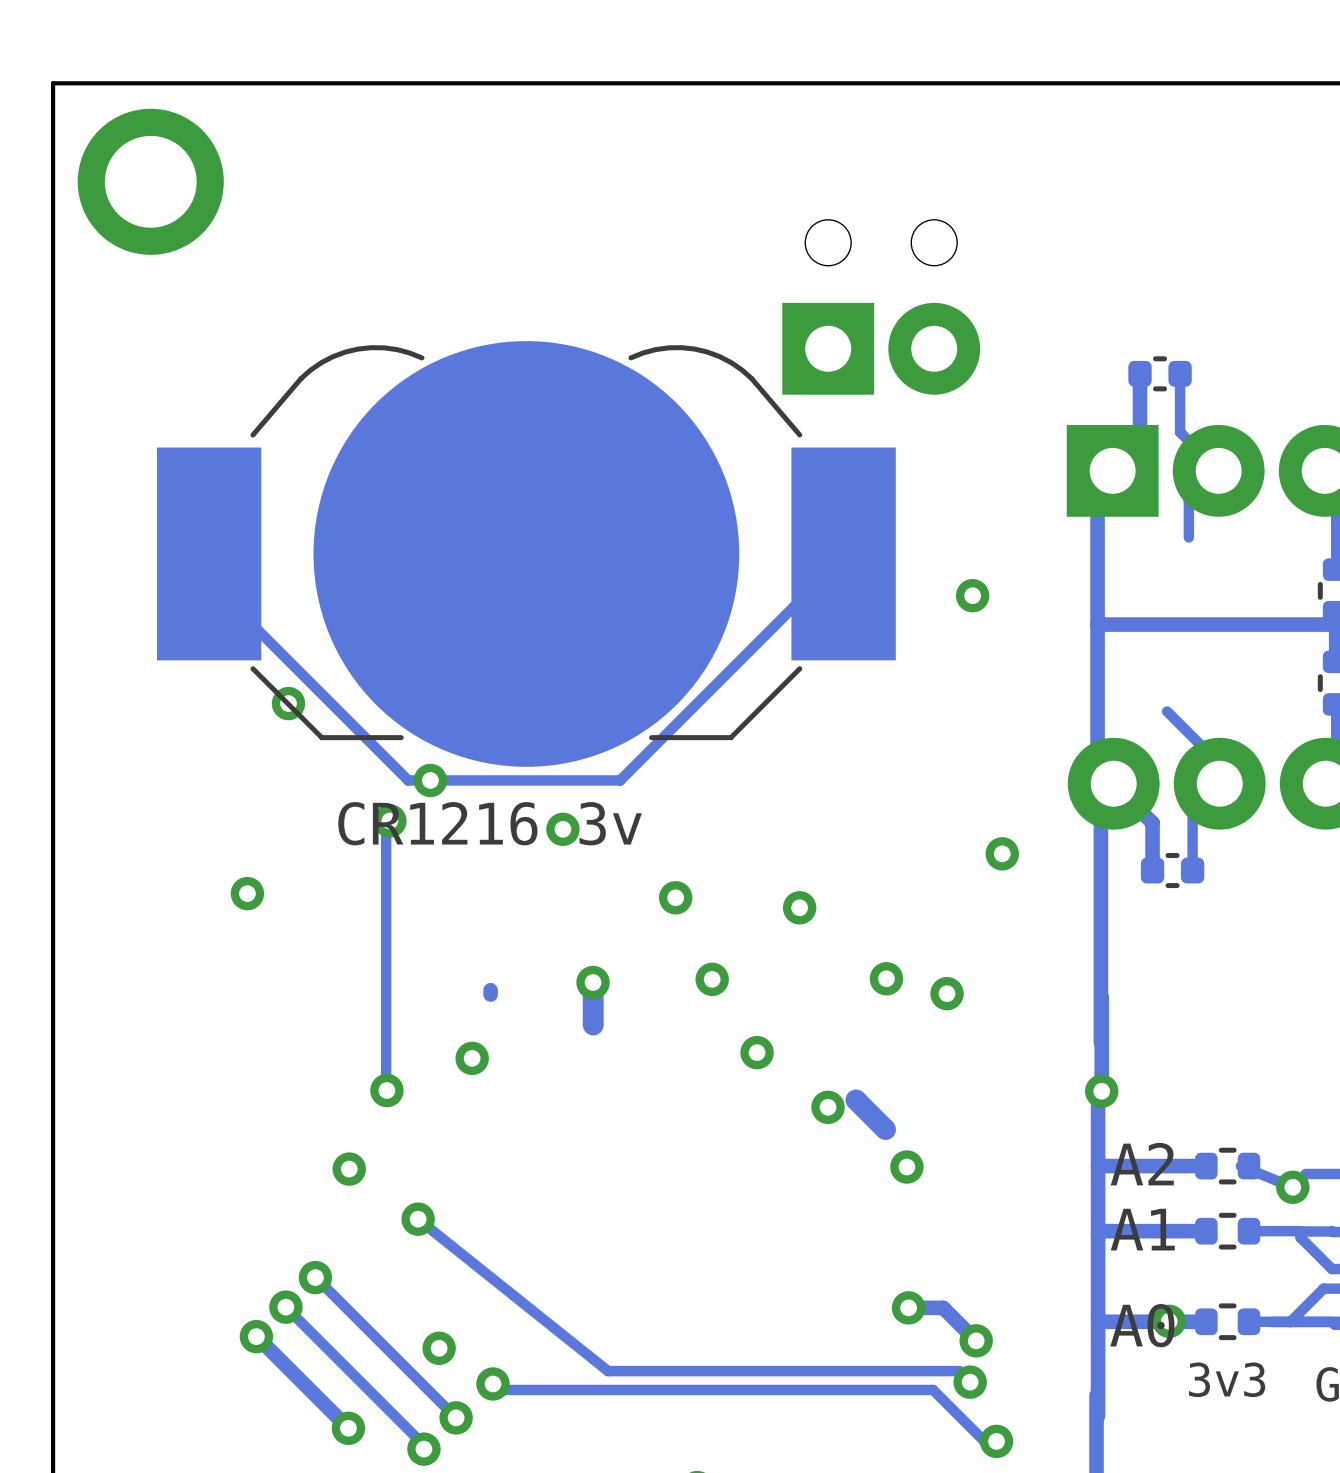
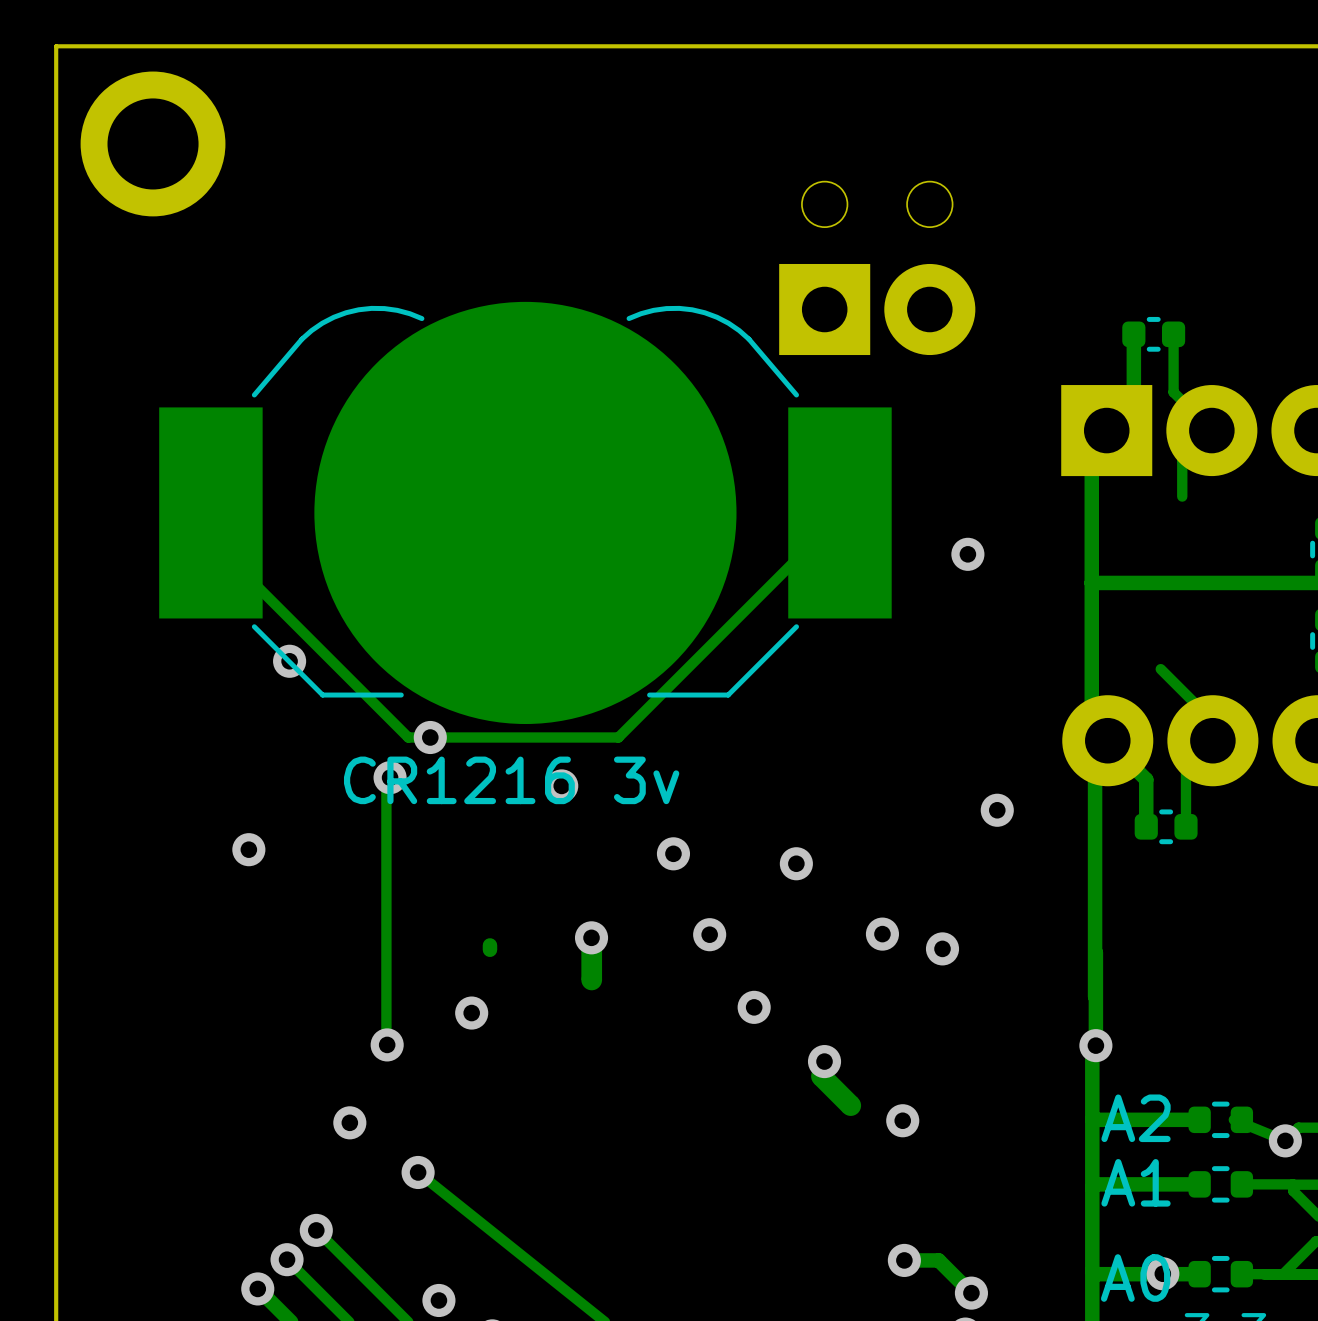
part position: (870, 1114) -> (836, 1090)

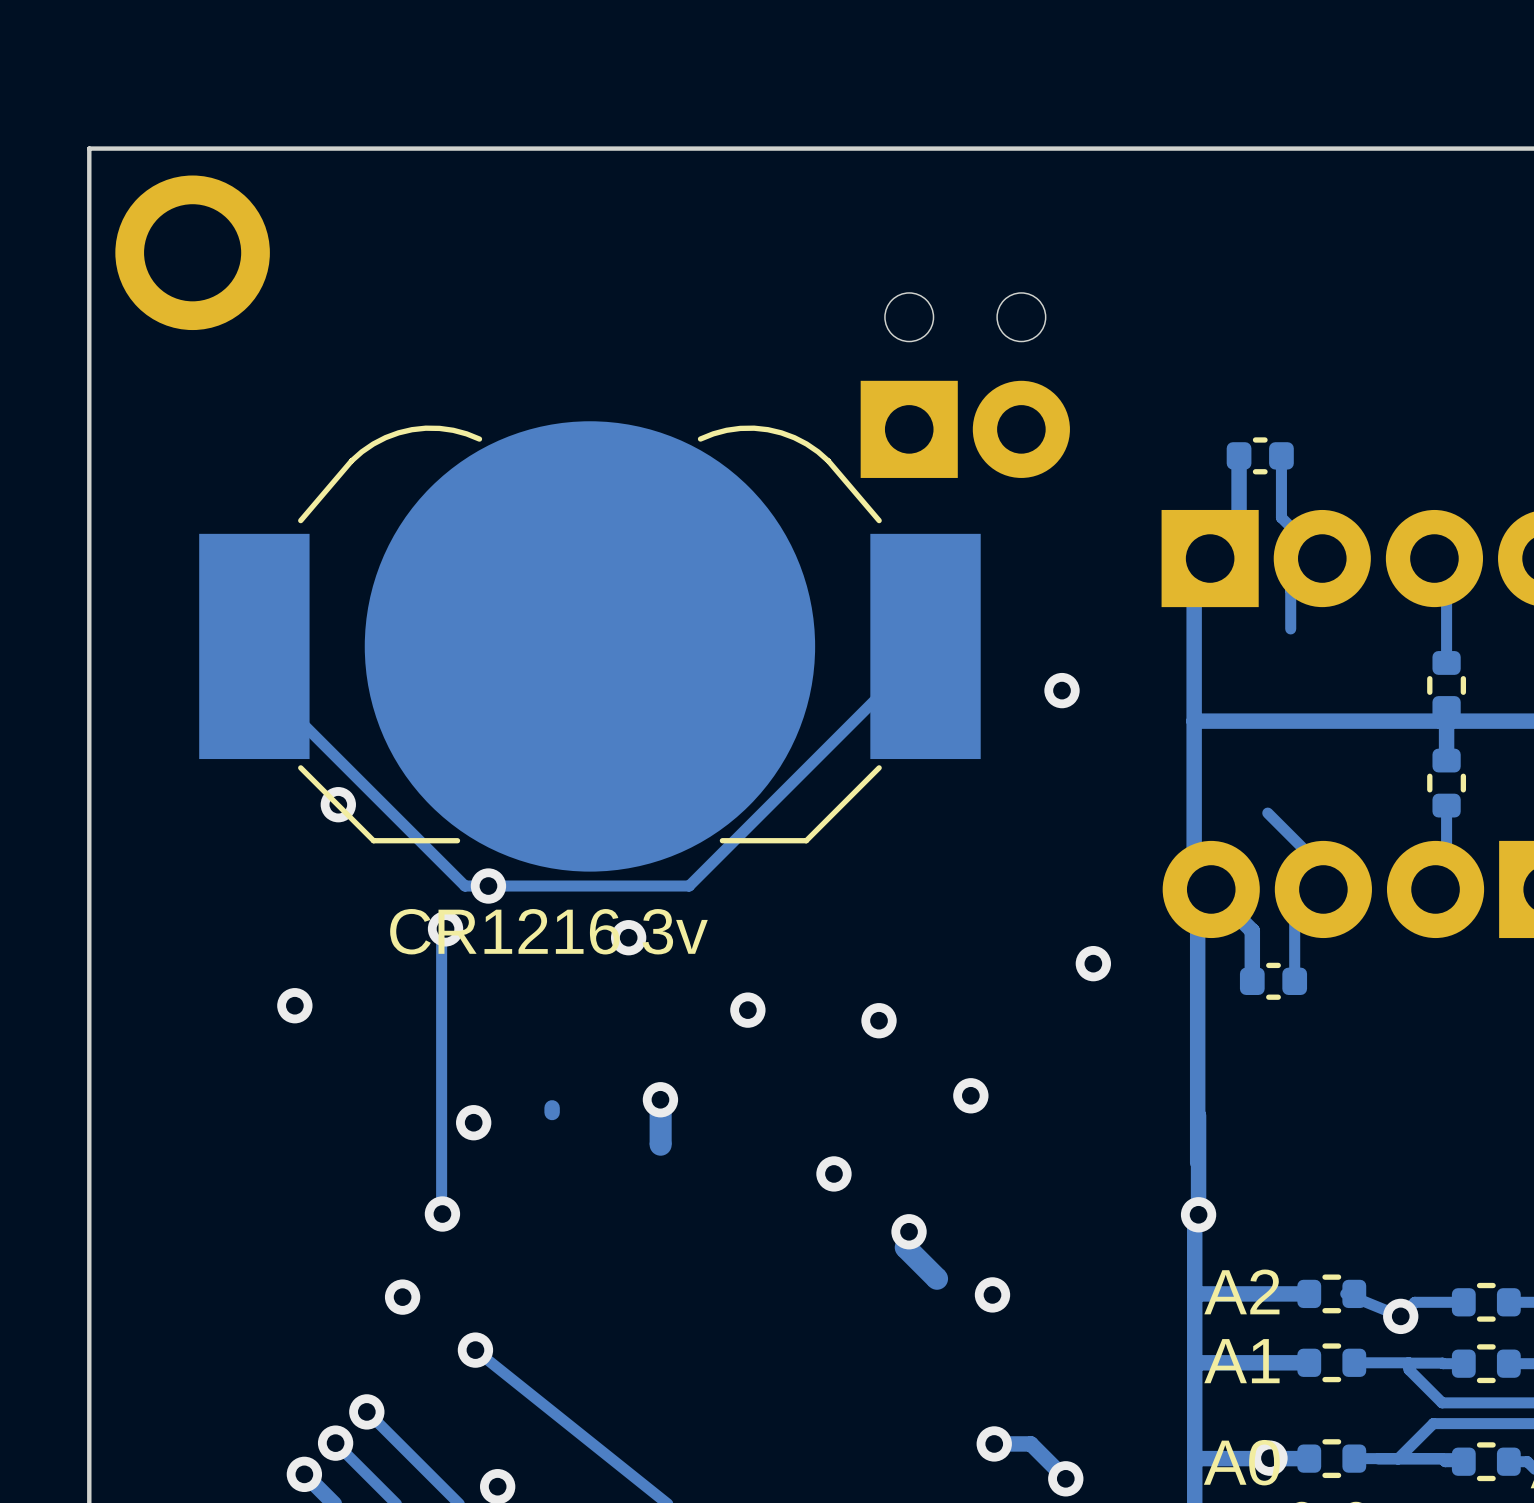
via: (709, 934) -> none
via: (942, 948) -> none
via position: (471, 1013) -> (473, 1122)

